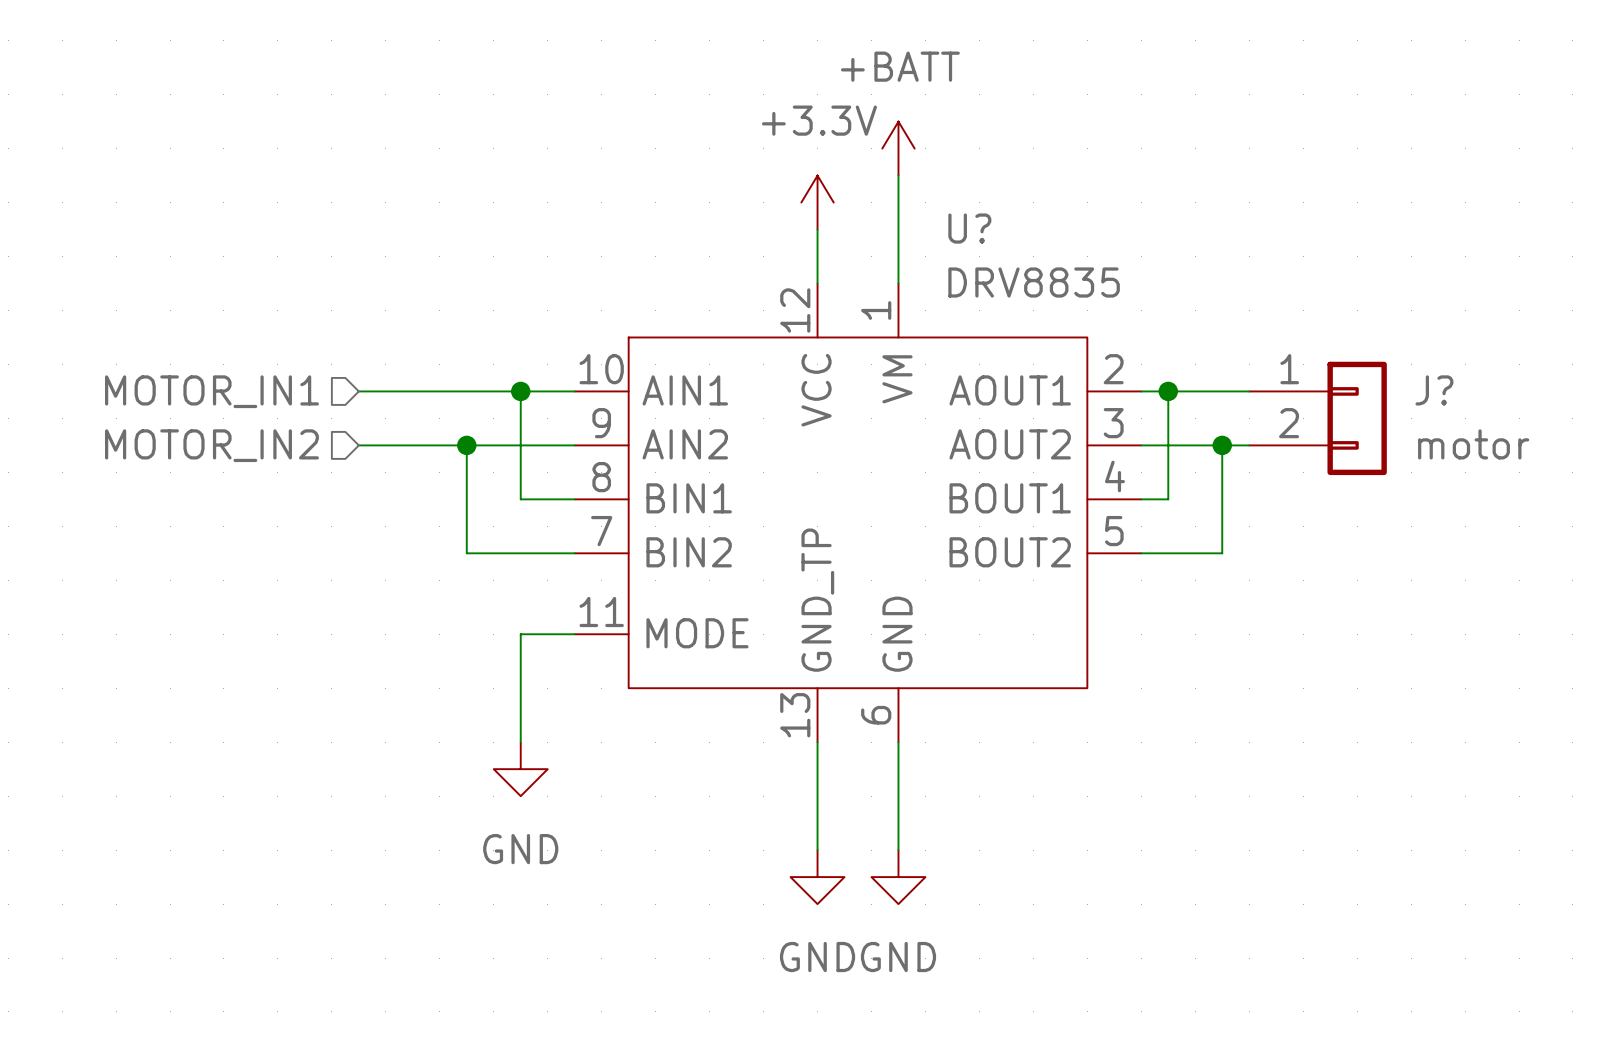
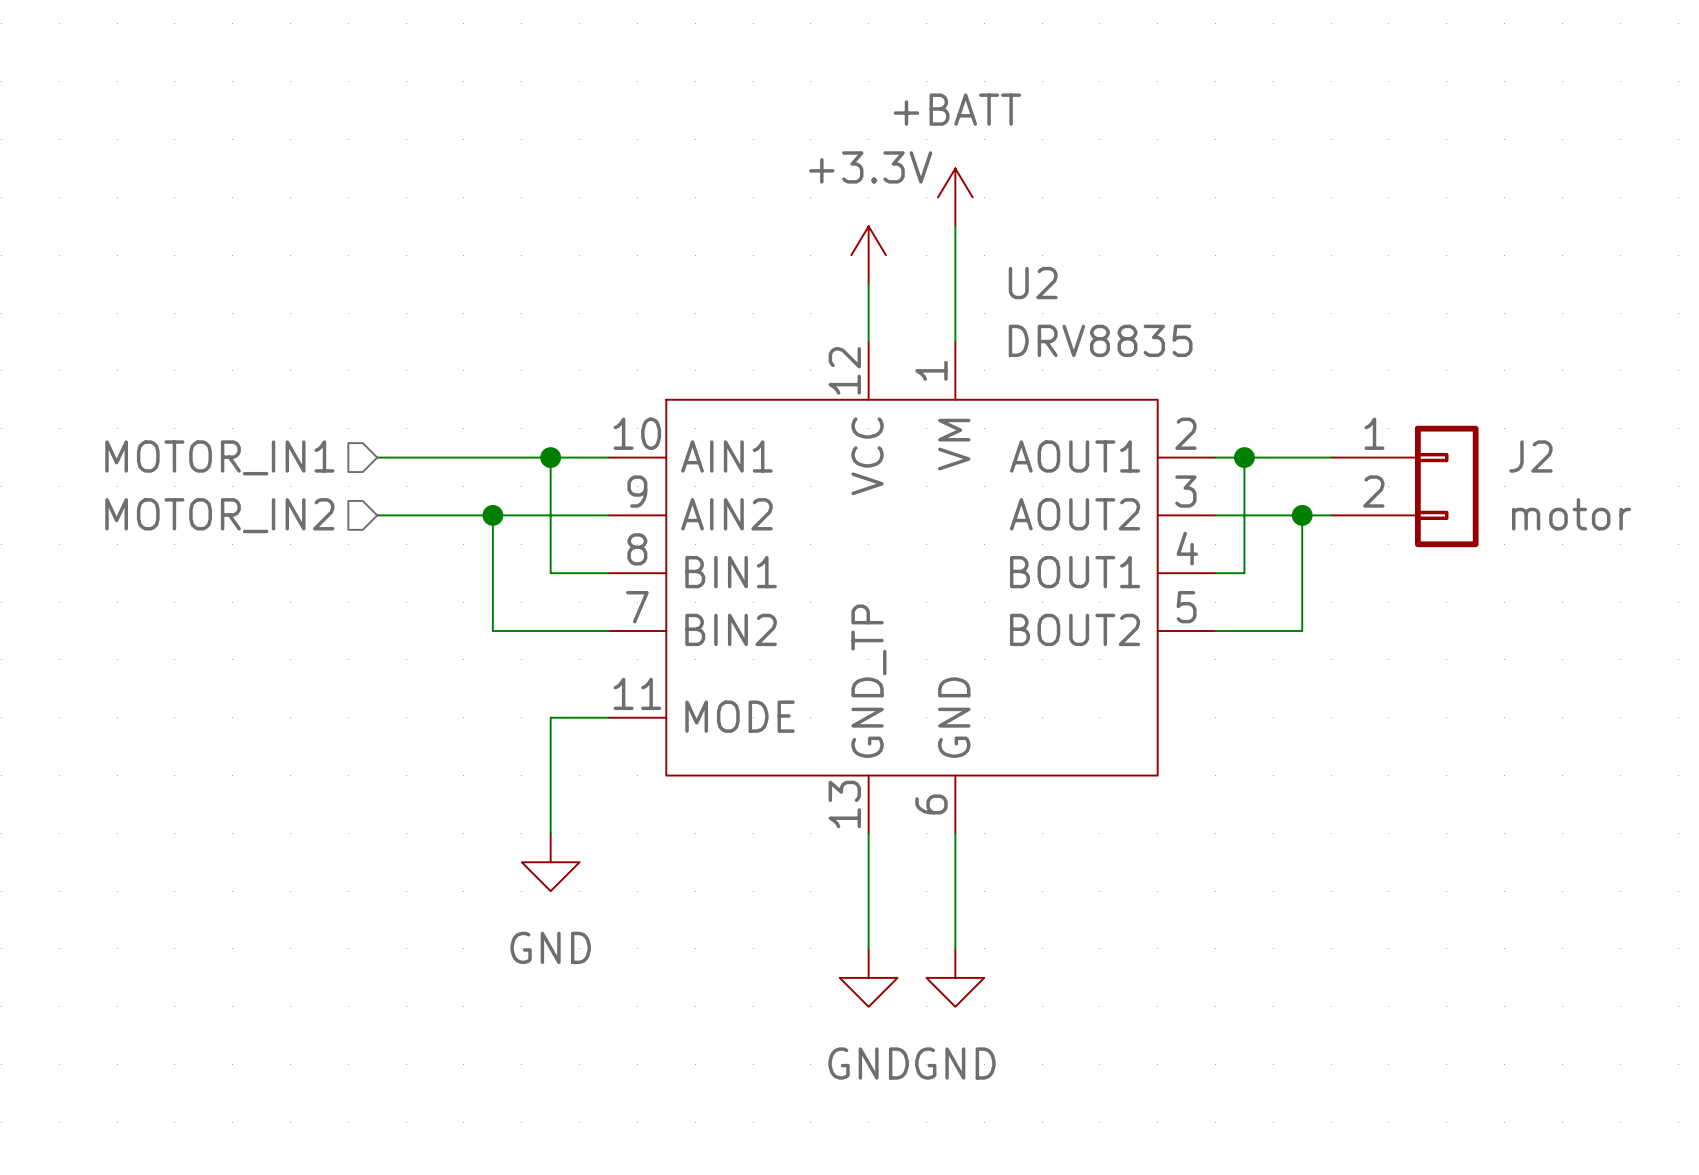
U? name: U? (969, 228) -> U2 (1033, 283)
J? name: J? (1434, 390) -> J2 (1530, 456)

